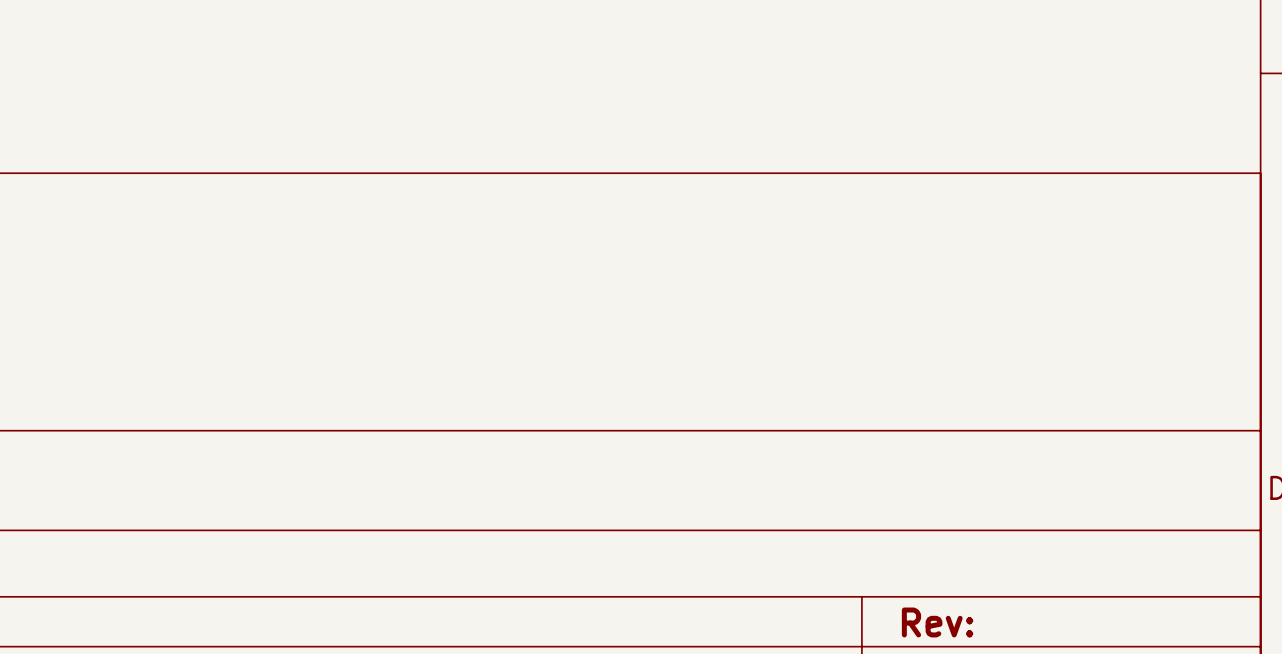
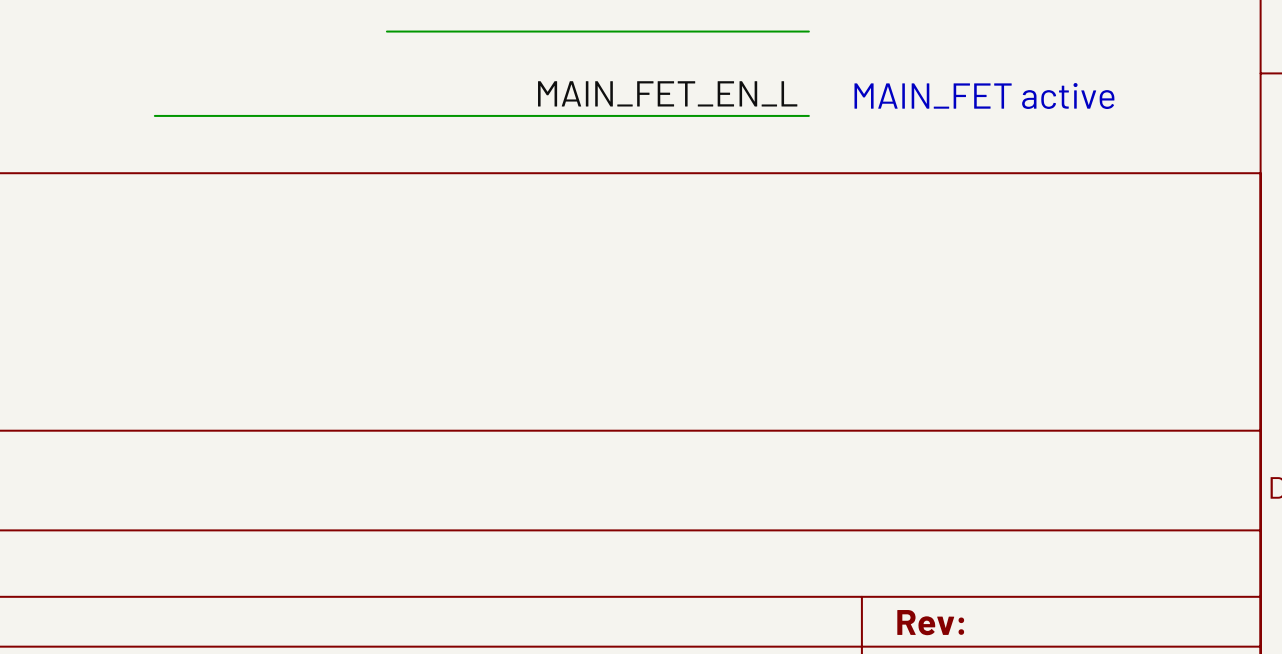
wire: none -> (386, 31) (808, 31)
label: none -> MAIN_FET_EN_L (667, 93)
text: none -> MAIN_FET active (984, 96)
wire: none -> (154, 115) (808, 115)

